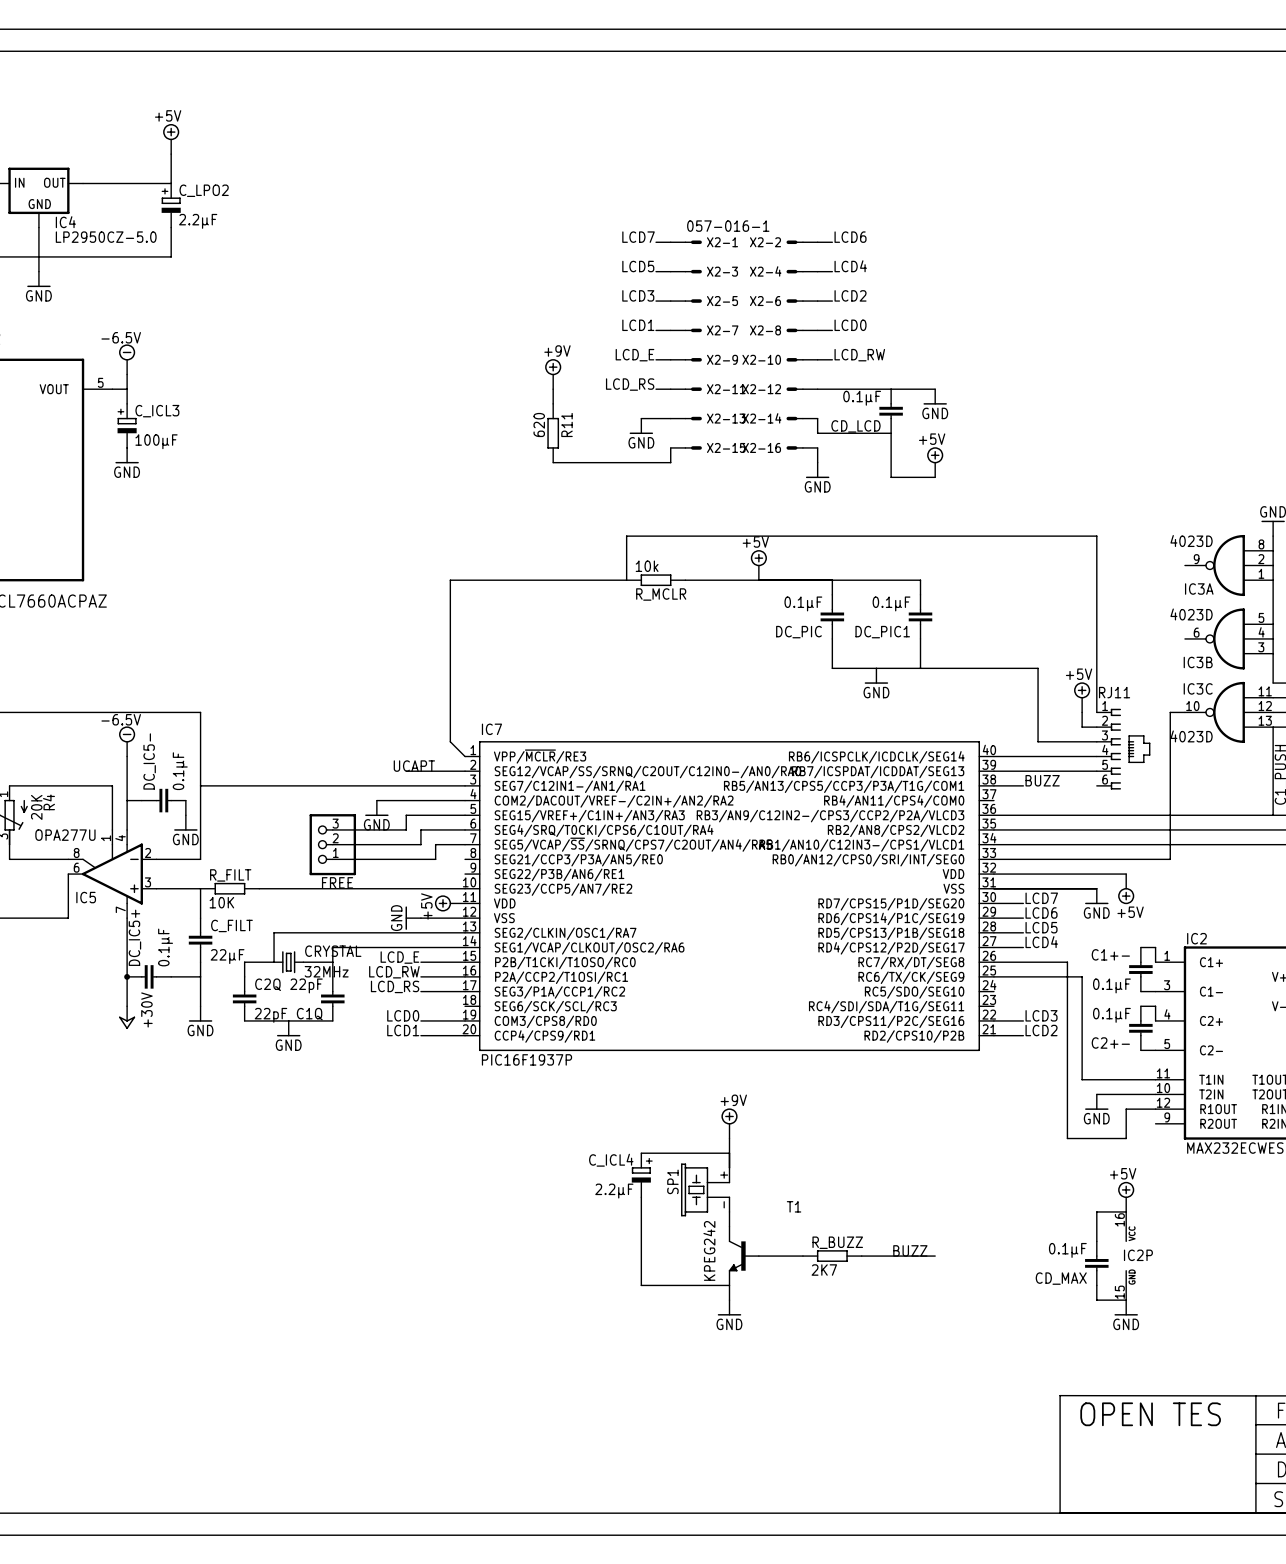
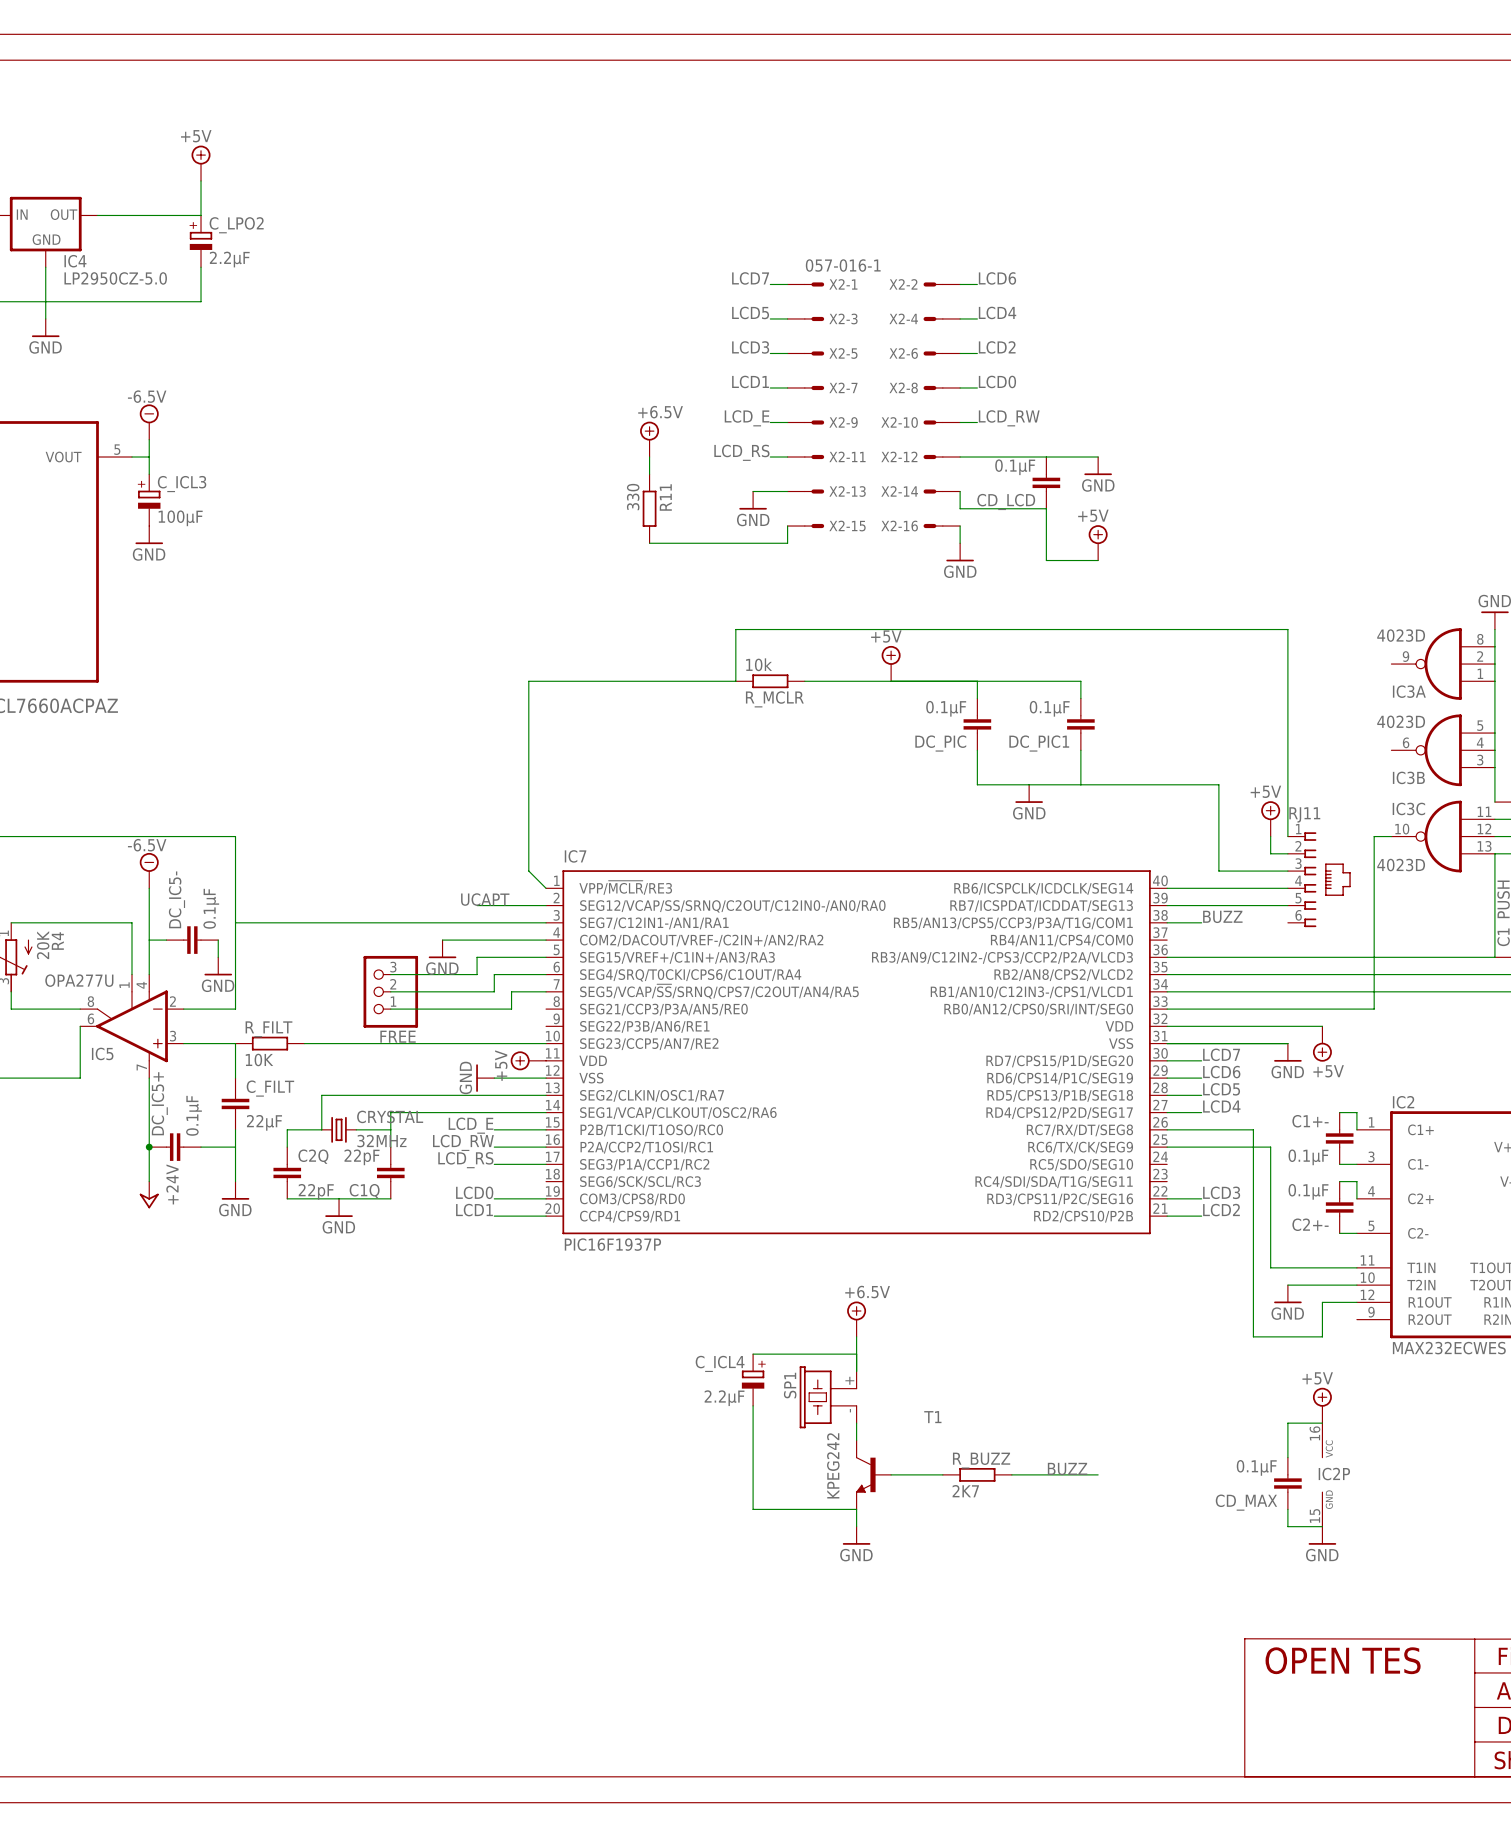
power symbol: +9V (553, 374) -> +6.5V (649, 439)
R11 value: 620 (539, 424) -> 330 (633, 497)
power symbol: +30V (127, 1017) -> +24V (149, 1194)
power symbol: +9V (729, 1123) -> +6.5V (856, 1319)

